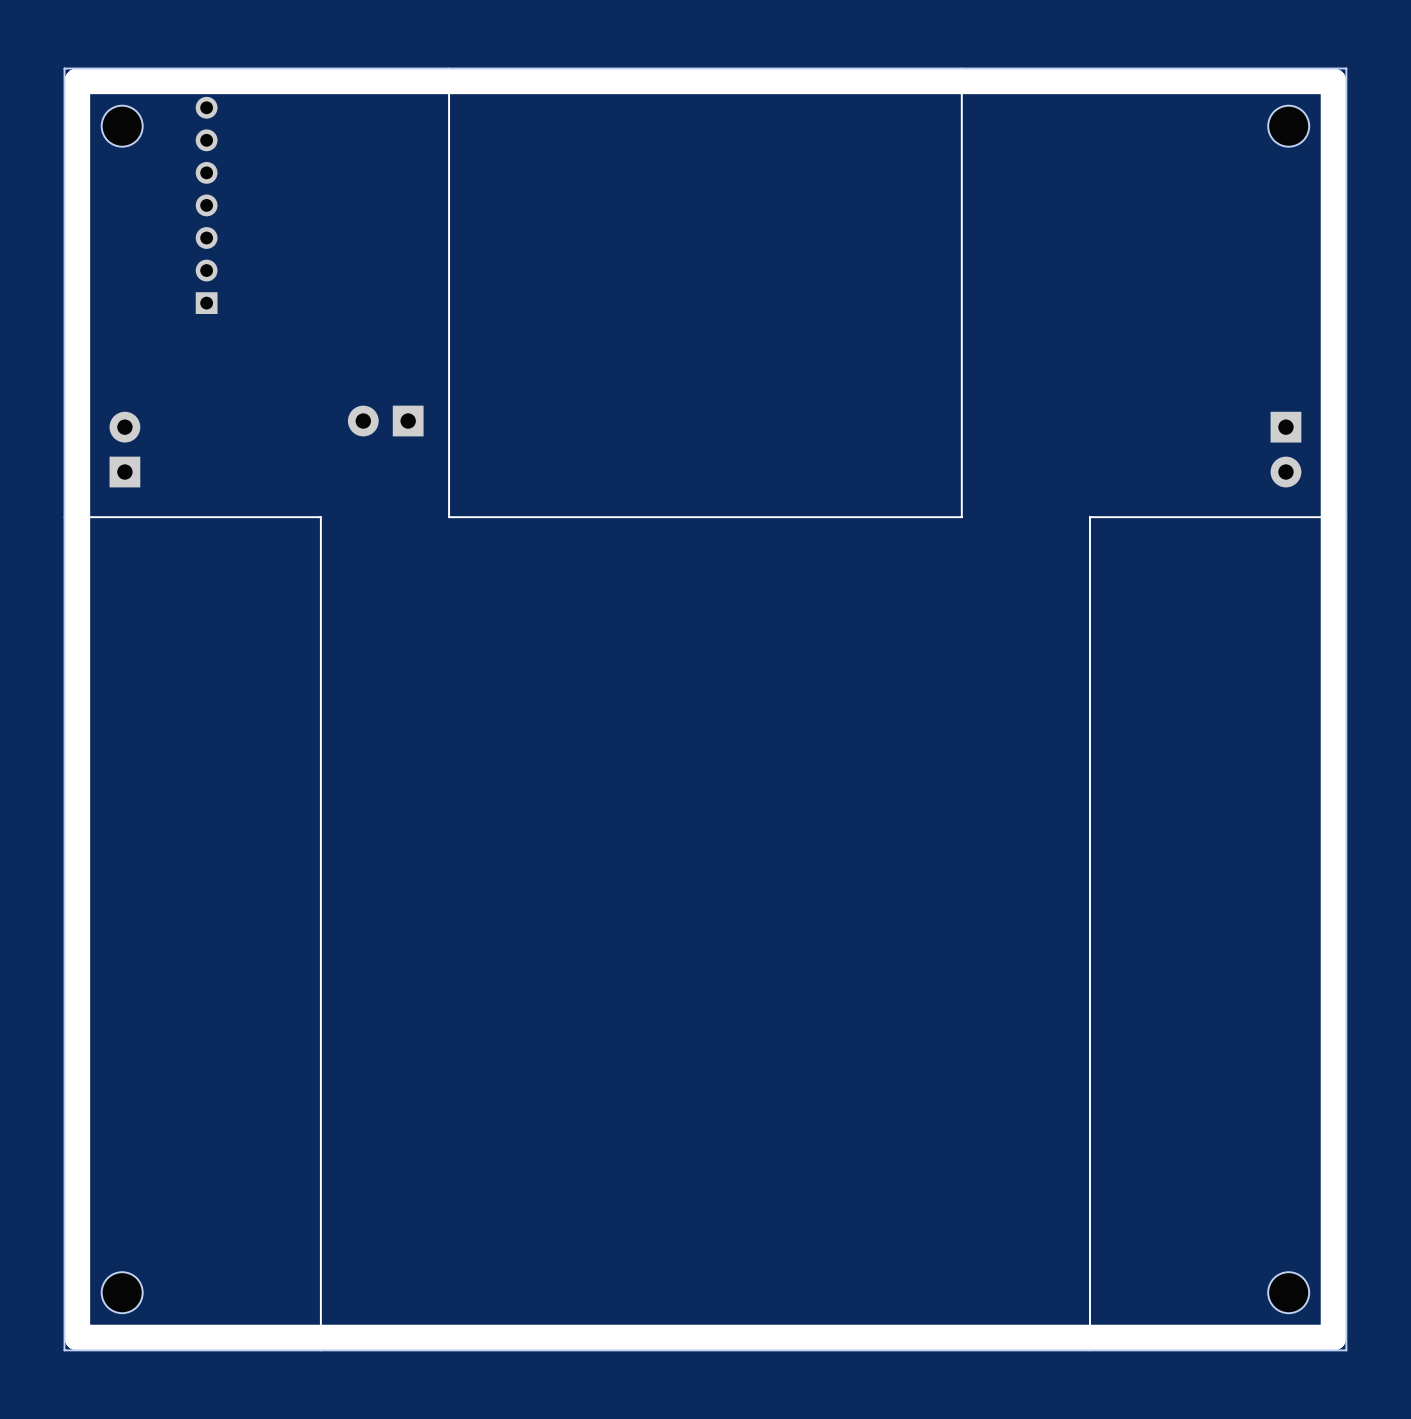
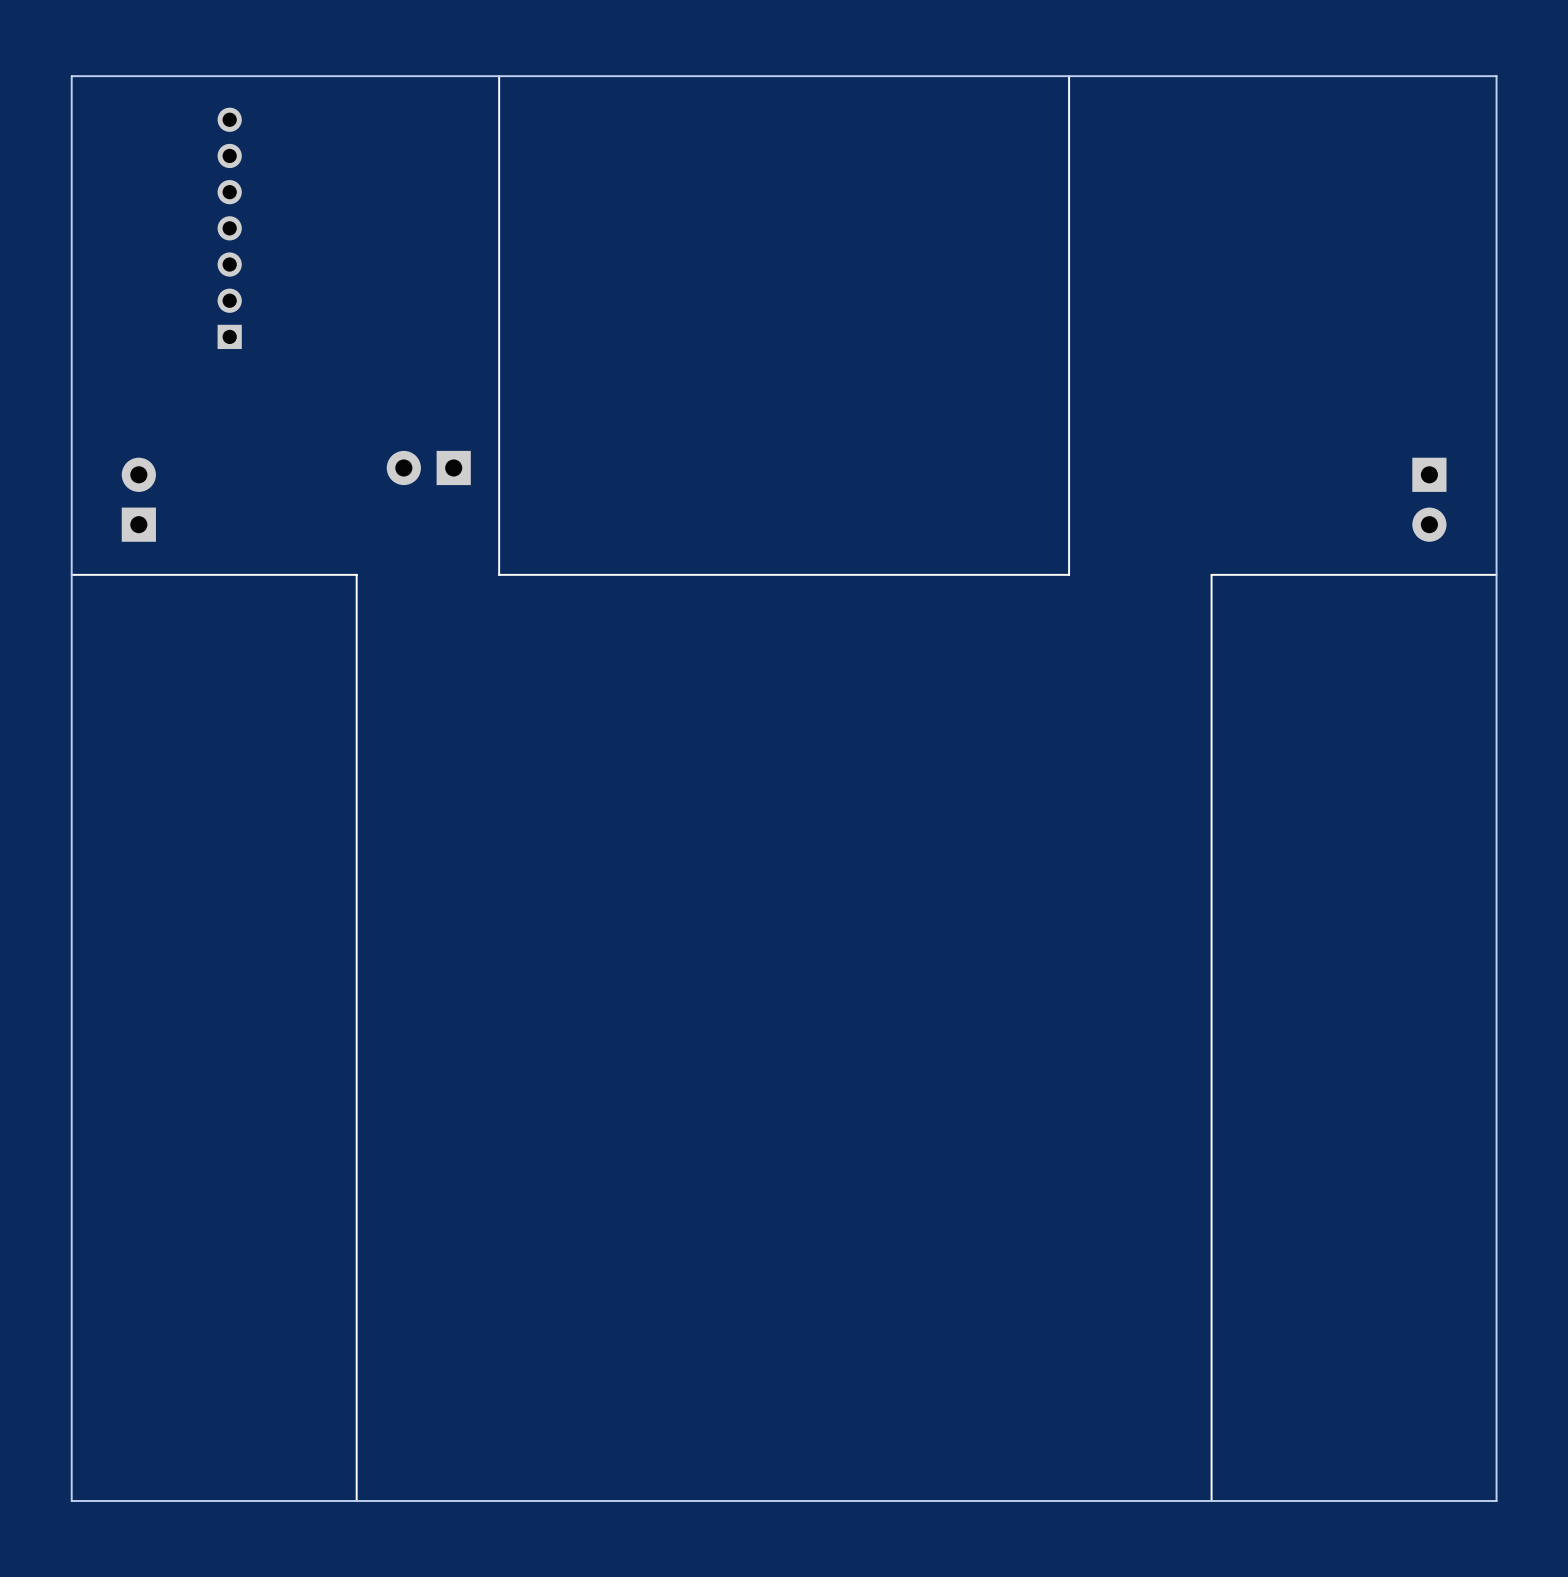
line: (1333, 81) (1333, 1337) (77, 1337) (77, 81) (1333, 81) -> none
part: (122, 126) -> none
part: (1288, 126) -> none
part: (122, 1292) -> none
part: (1288, 1292) -> none

